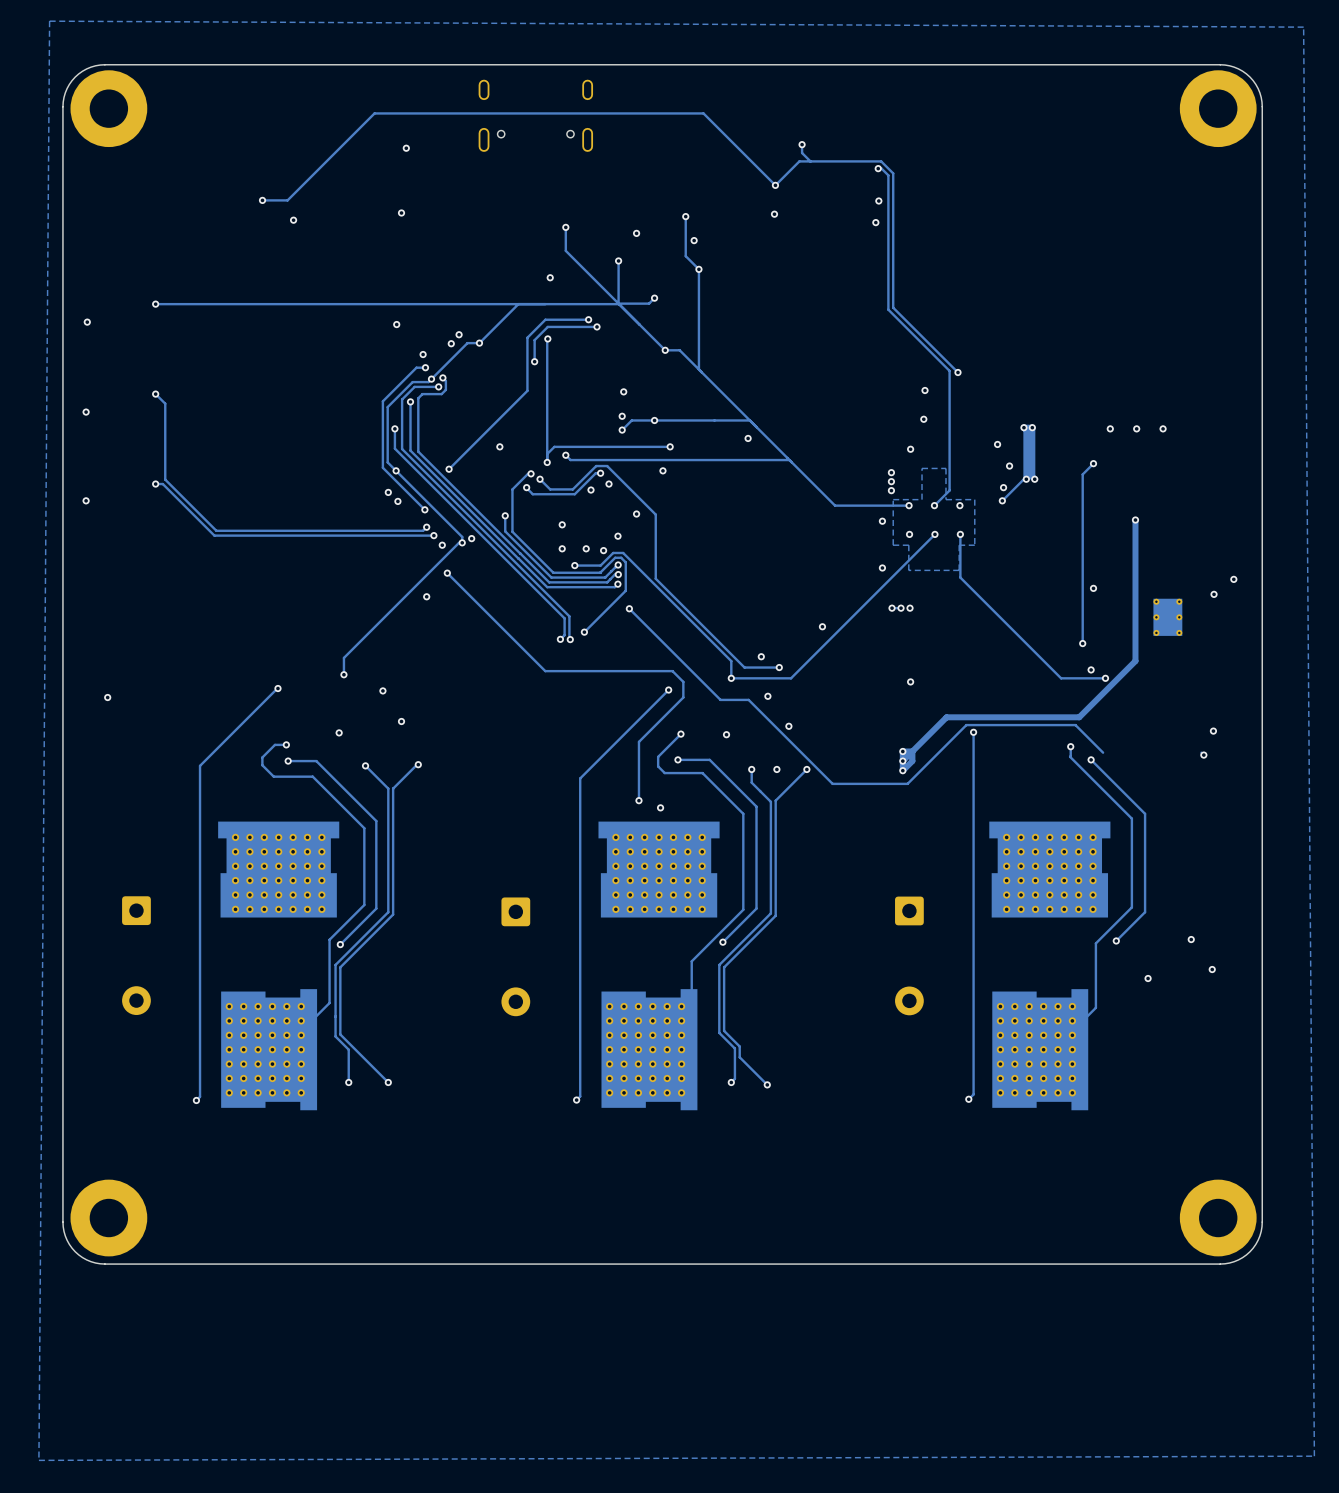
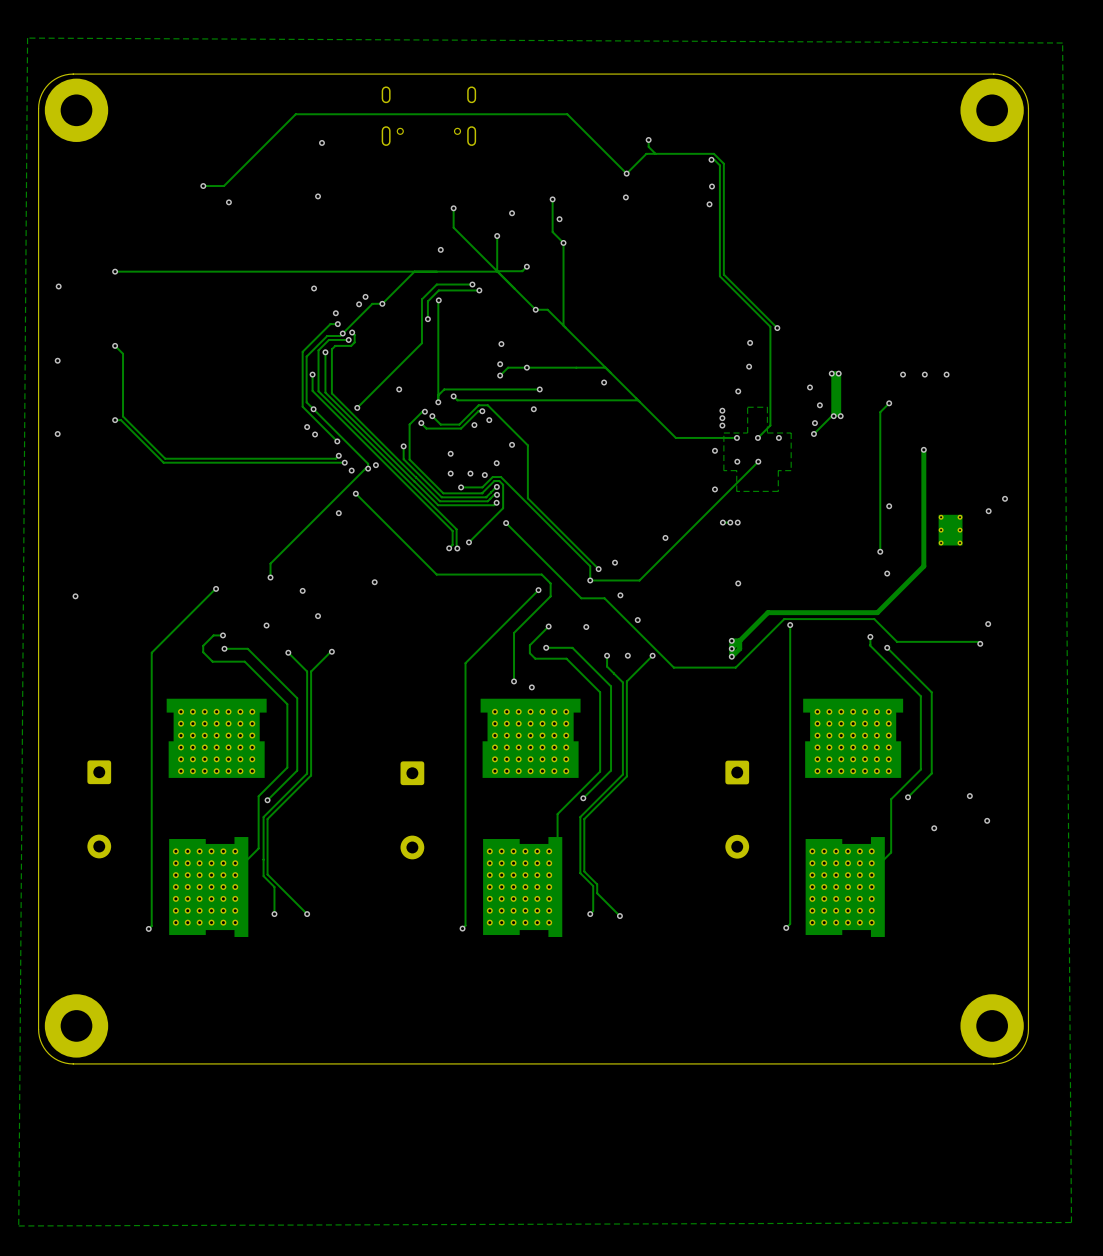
track: (960, 534) (960, 577) (1061, 678) (1105, 678) -> none
via: (960, 534) -> none
track: (741, 664) (744, 667) (779, 667) -> none
via position: (779, 667) -> (598, 569)
via: (1105, 678) -> none
via: none -> (374, 582)
track: none -> (978, 641) (897, 641)

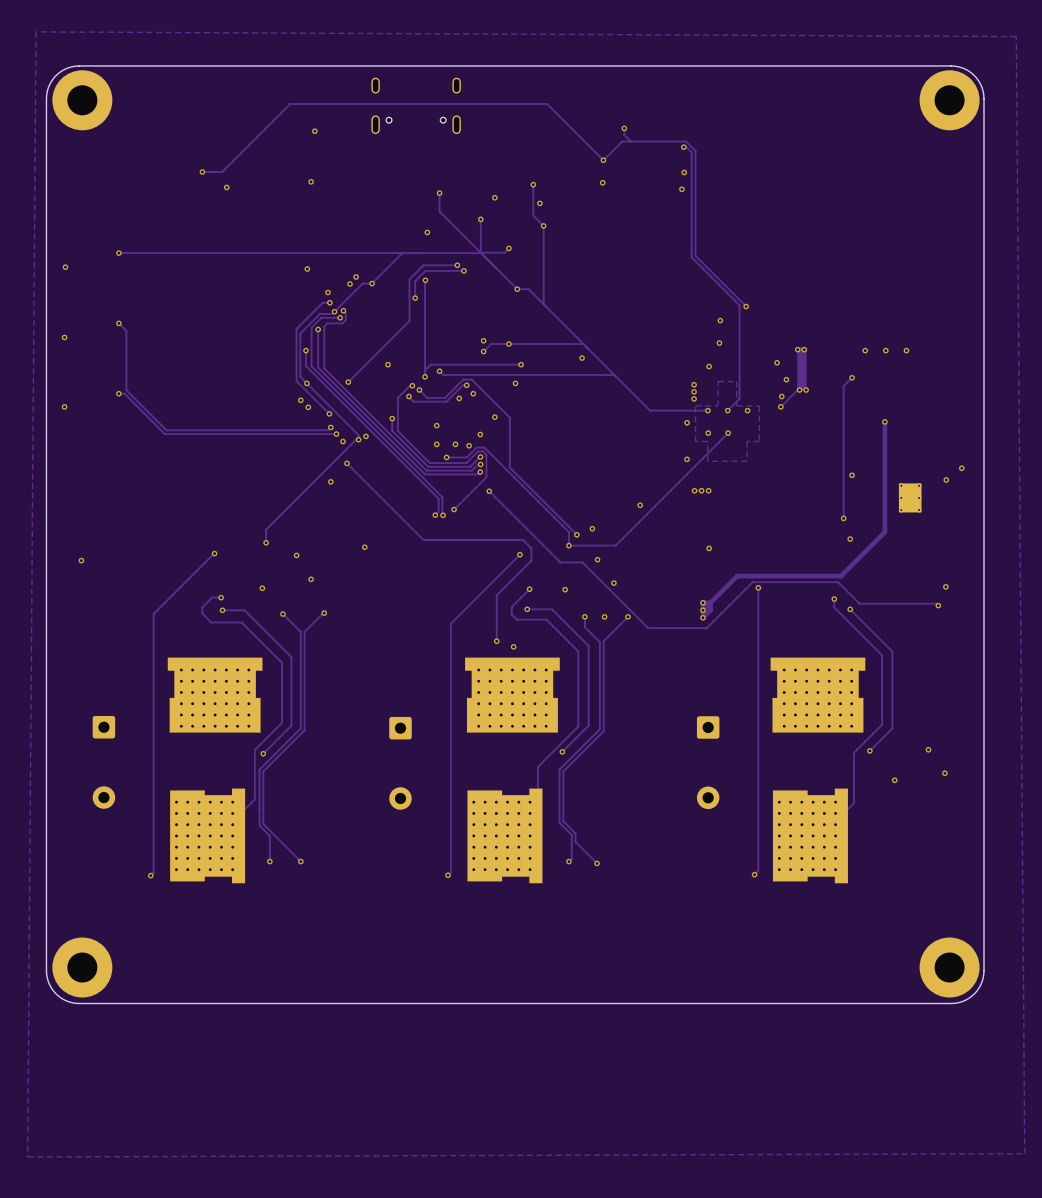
via: (501, 344) -> none

